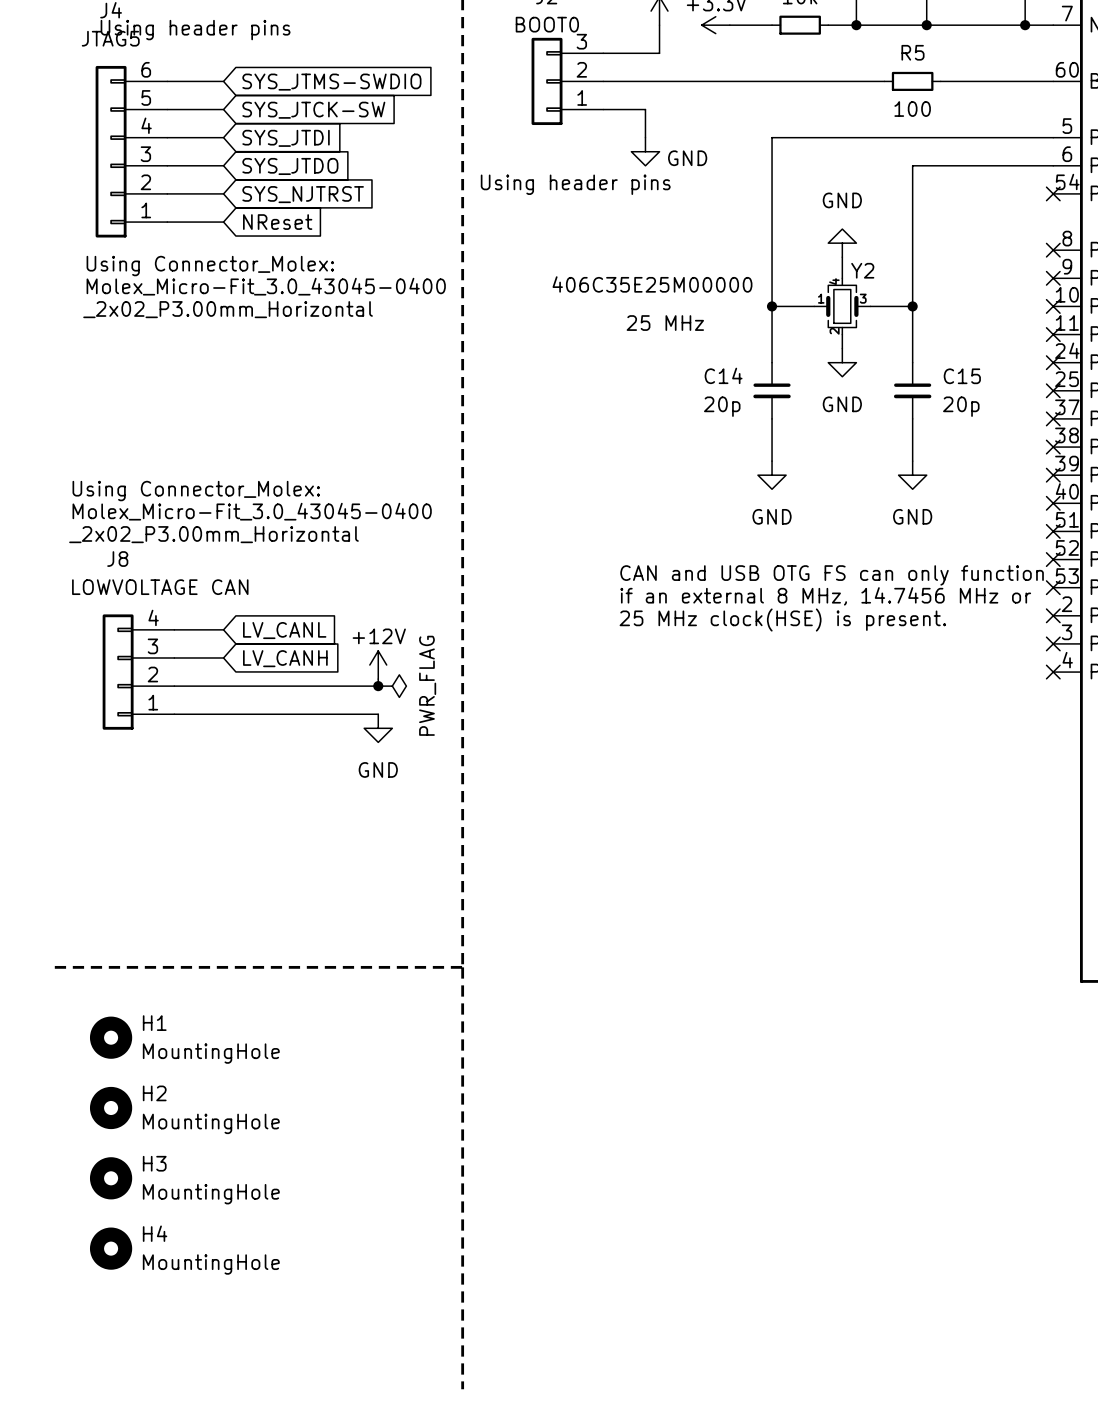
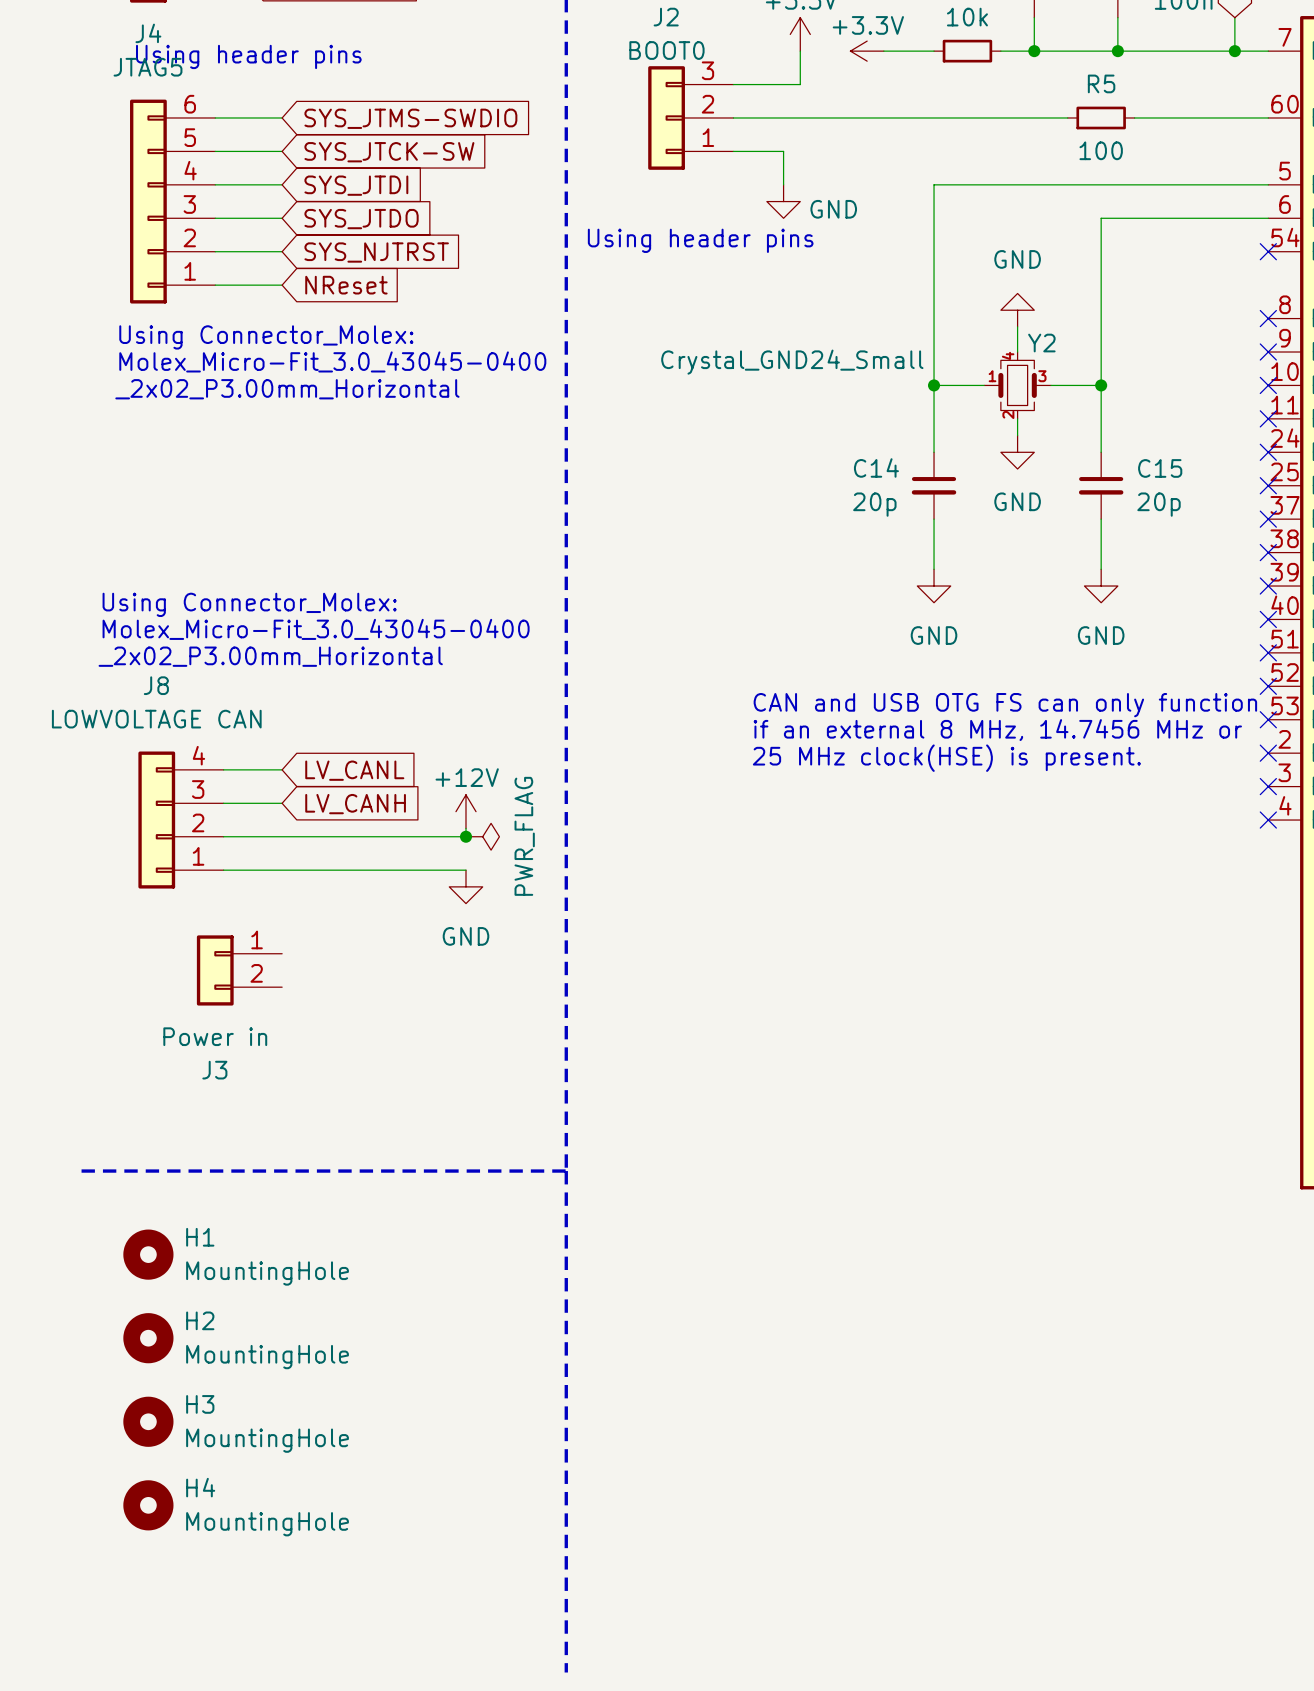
Y2 value: 406C35E25M00000 (652, 284) -> Crystal_GND24_Small (792, 362)
text: 25 MHz (665, 323) -> none
J8 value position: LOWVOLTAGE CAN (160, 587) -> LOWVOLTAGE CAN (156, 719)
J3: none -> Power in (239, 970)

